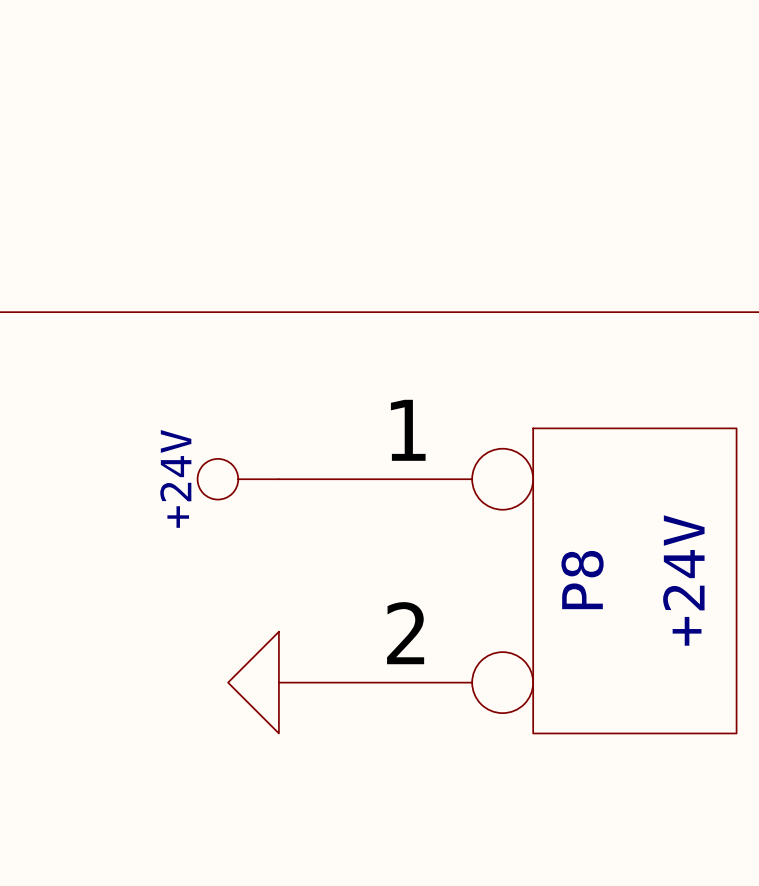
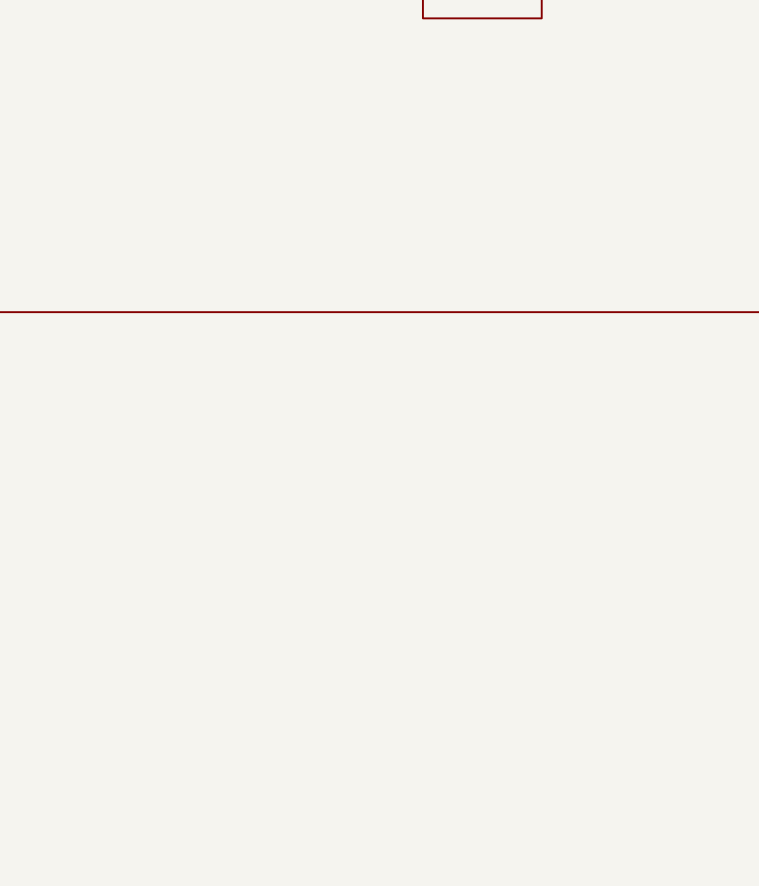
power symbol: +24V (238, 479) -> none
P8: +24V (507, 580) -> none
power symbol: (253, 682) -> none

